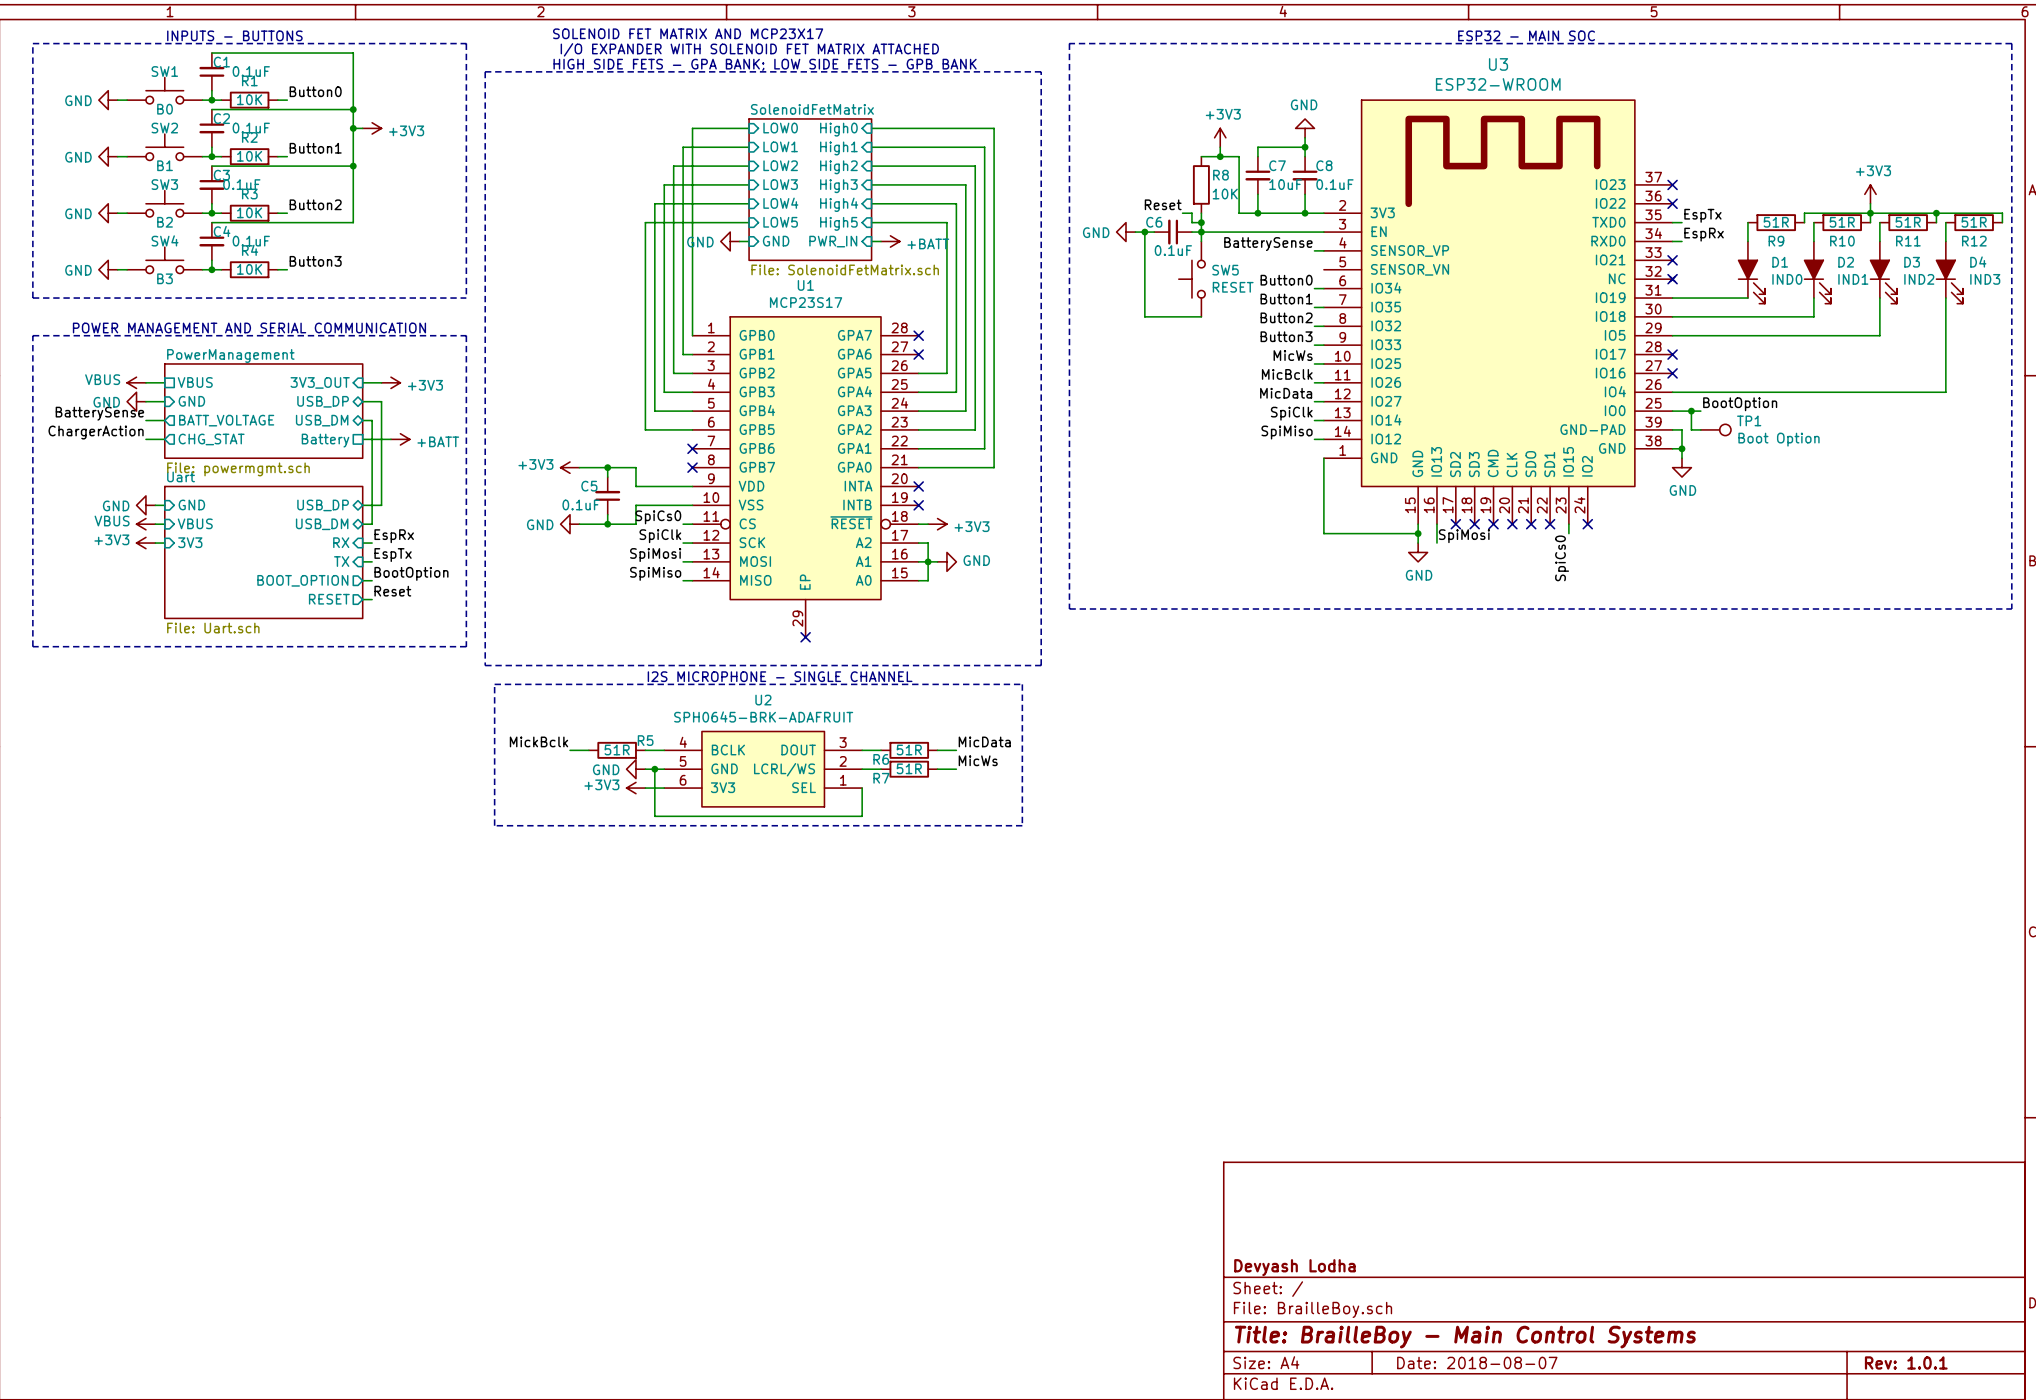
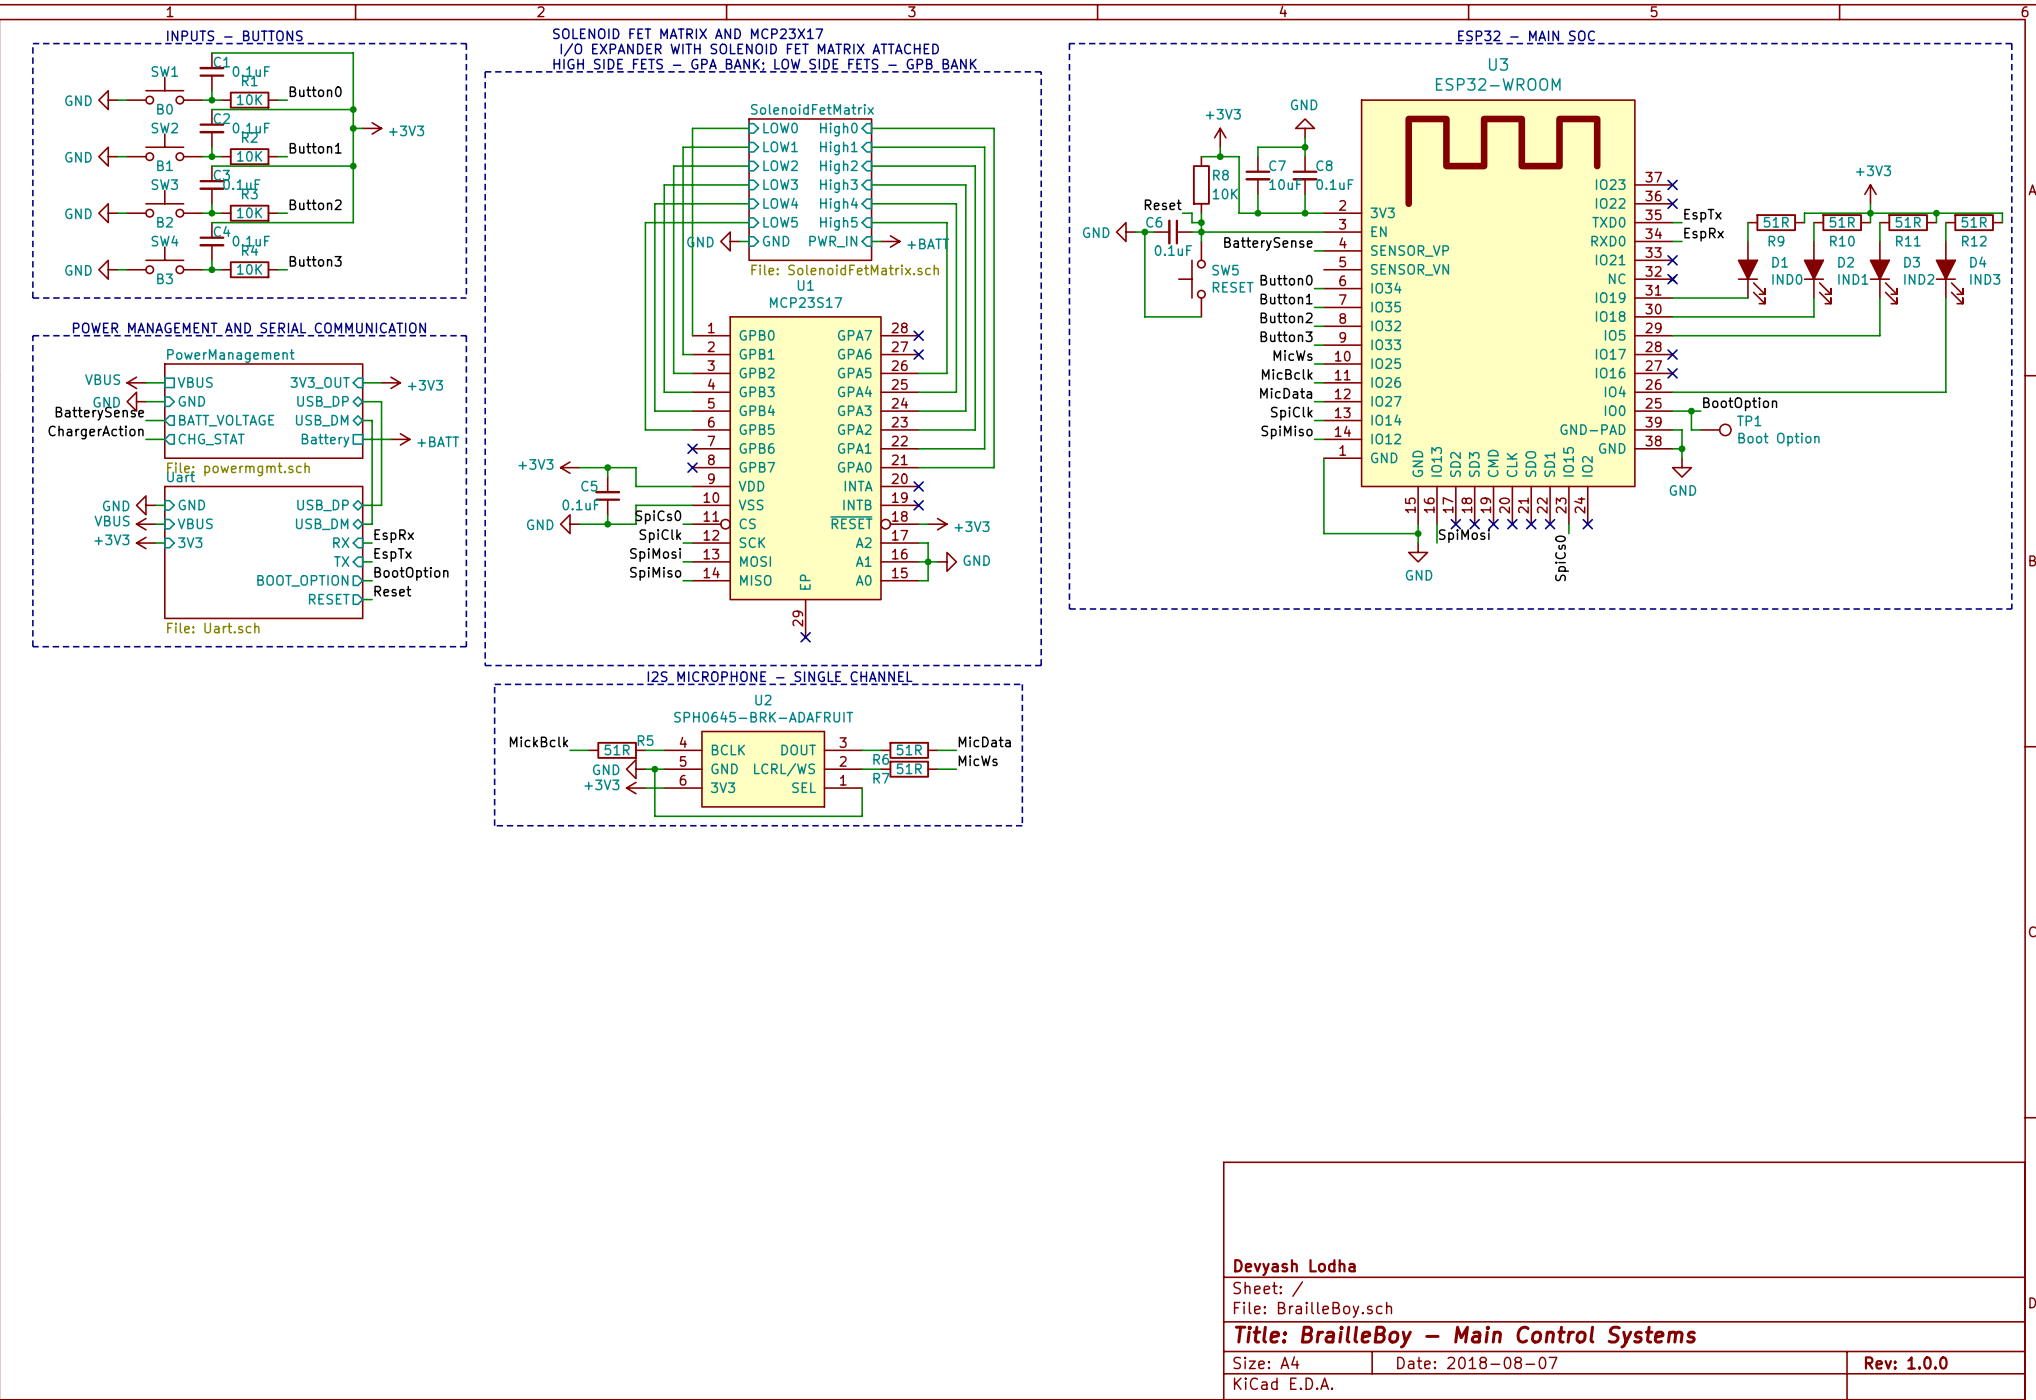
title block: Rev: 1.0.1 (1906, 1362) -> Rev: 1.0.0 (1906, 1362)

